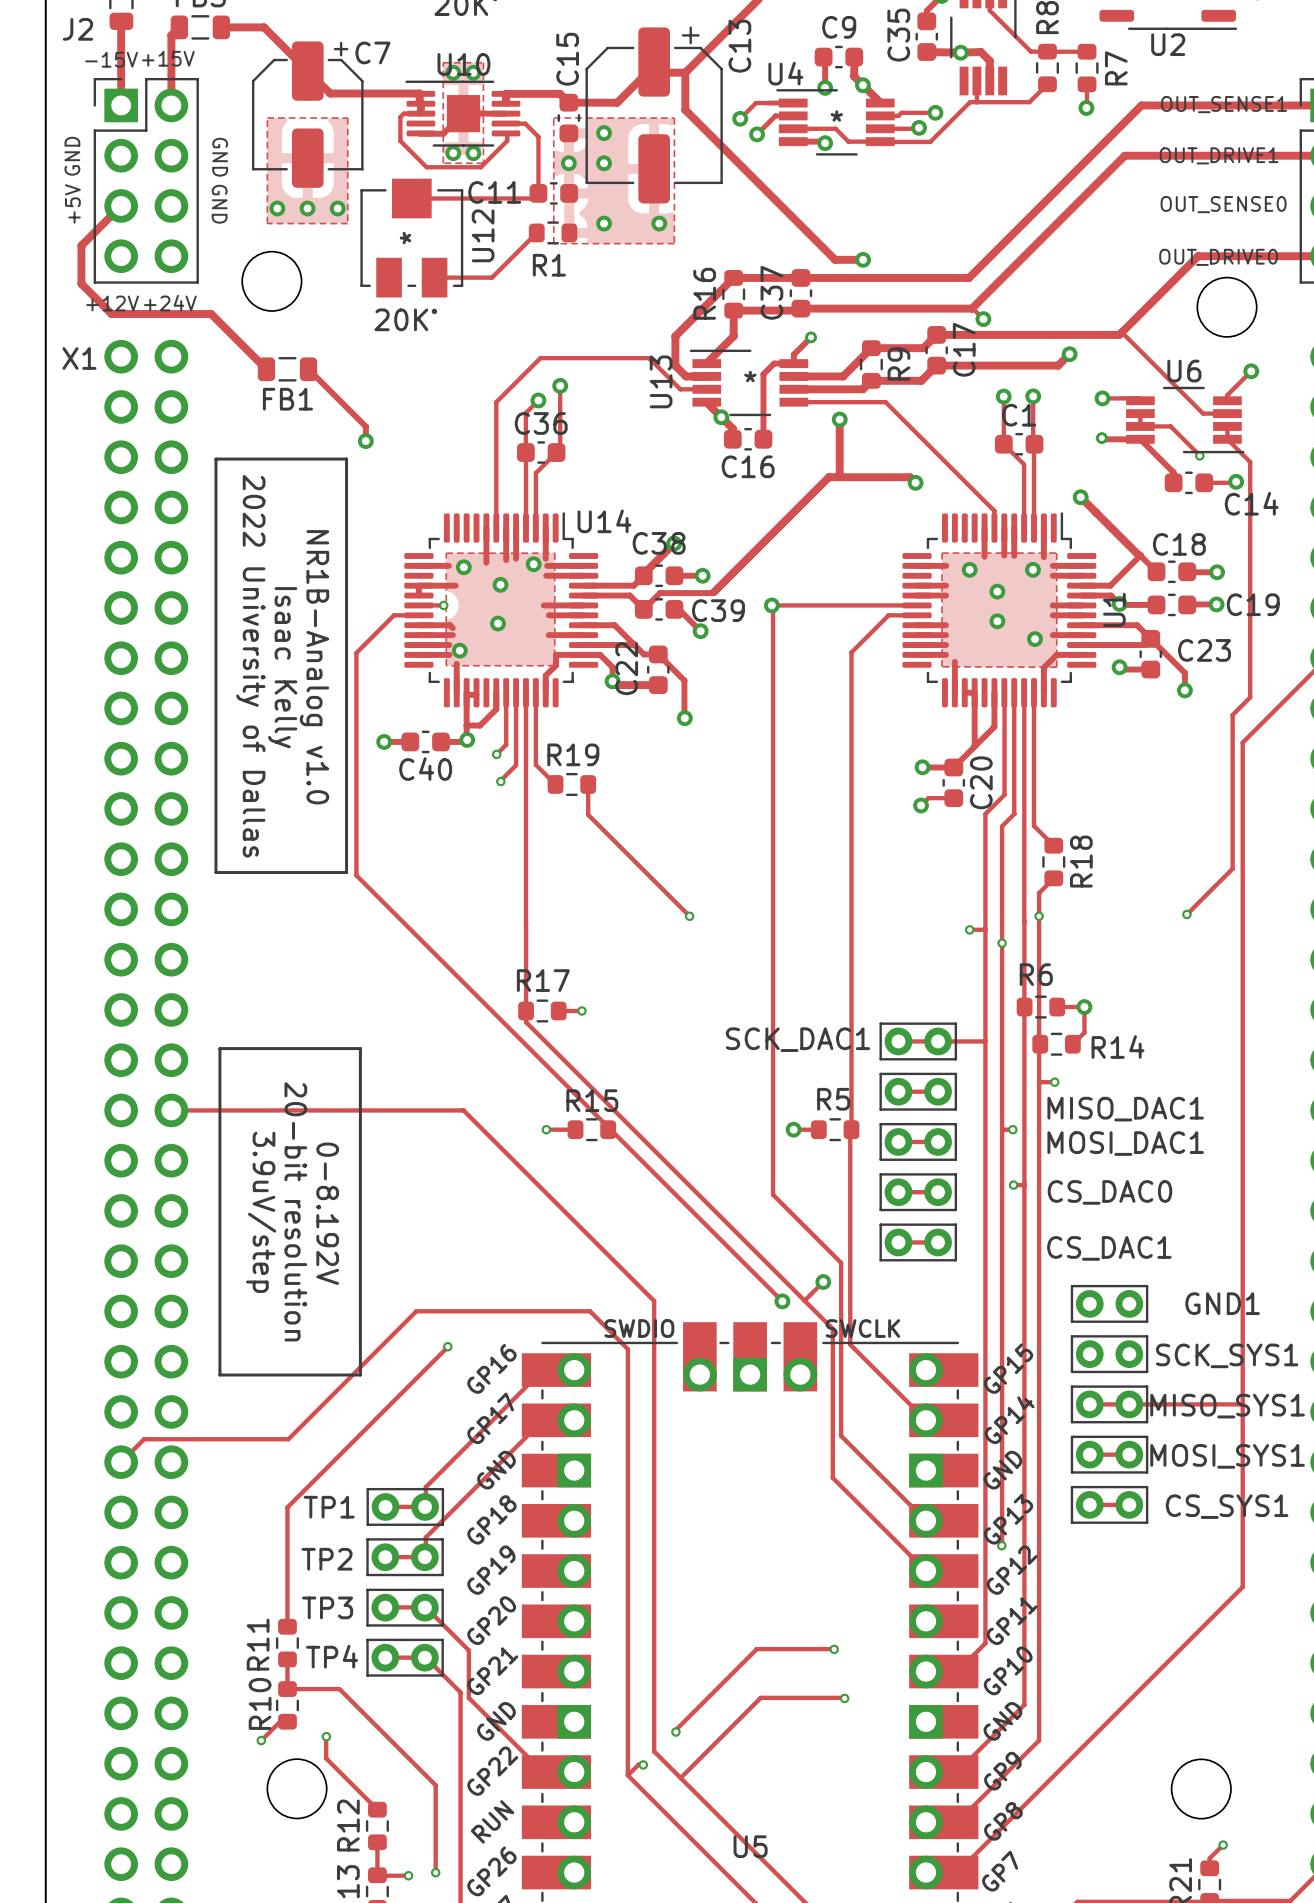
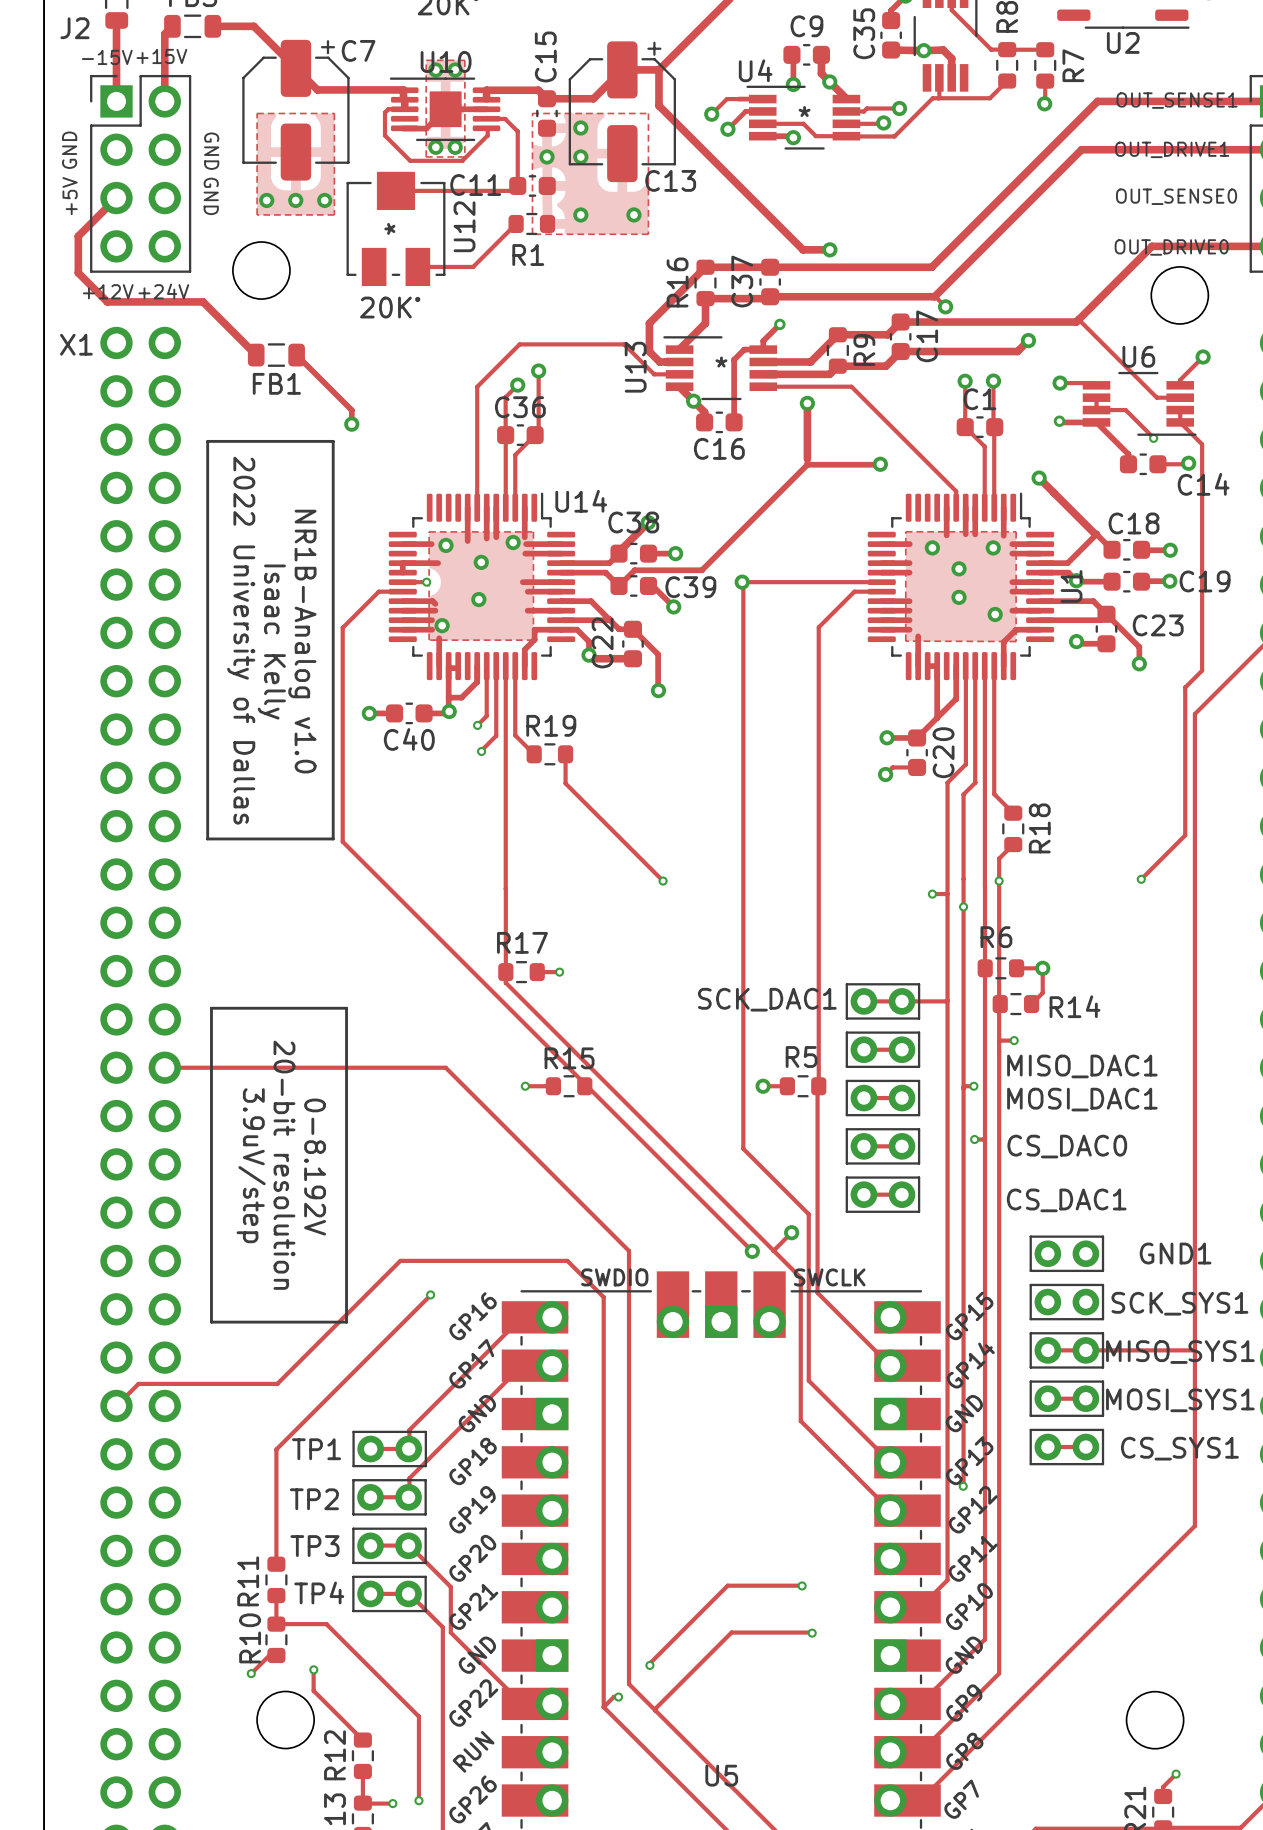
C13 footprint: [585, 26, 723, 204] -> [568, 41, 676, 183]
C13 name position: C13 (739, 46) -> C13 (670, 180)
track: (915, 482) (909, 477) (828, 477) (713, 593) -> (807, 464) (701, 570) (685, 570)
track: none -> (880, 464) (807, 464)

